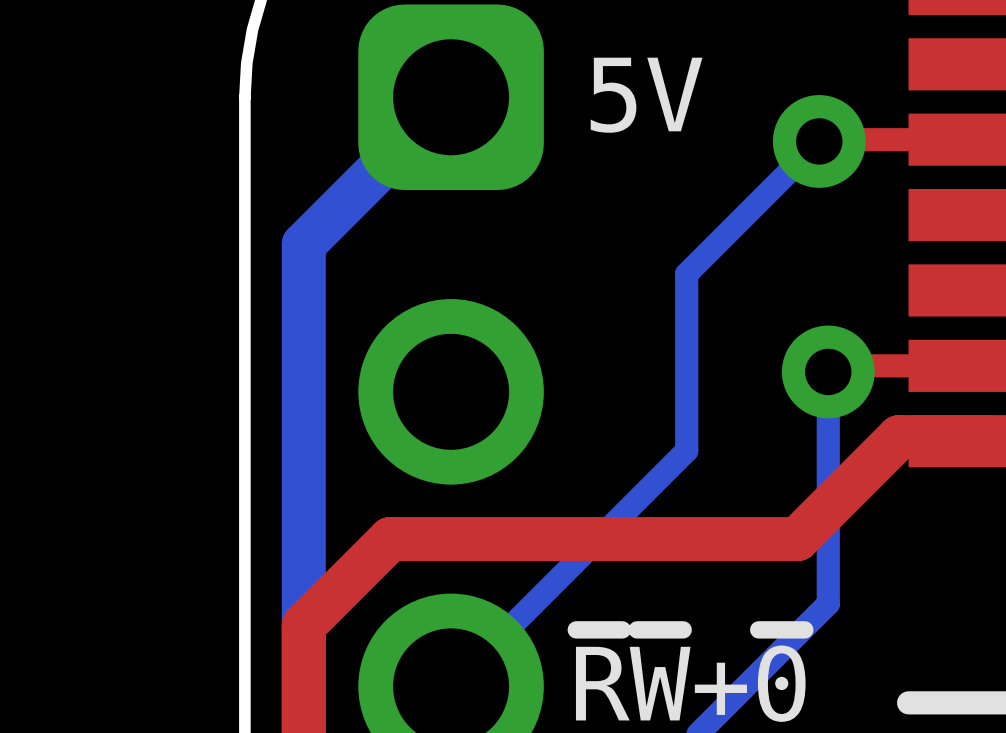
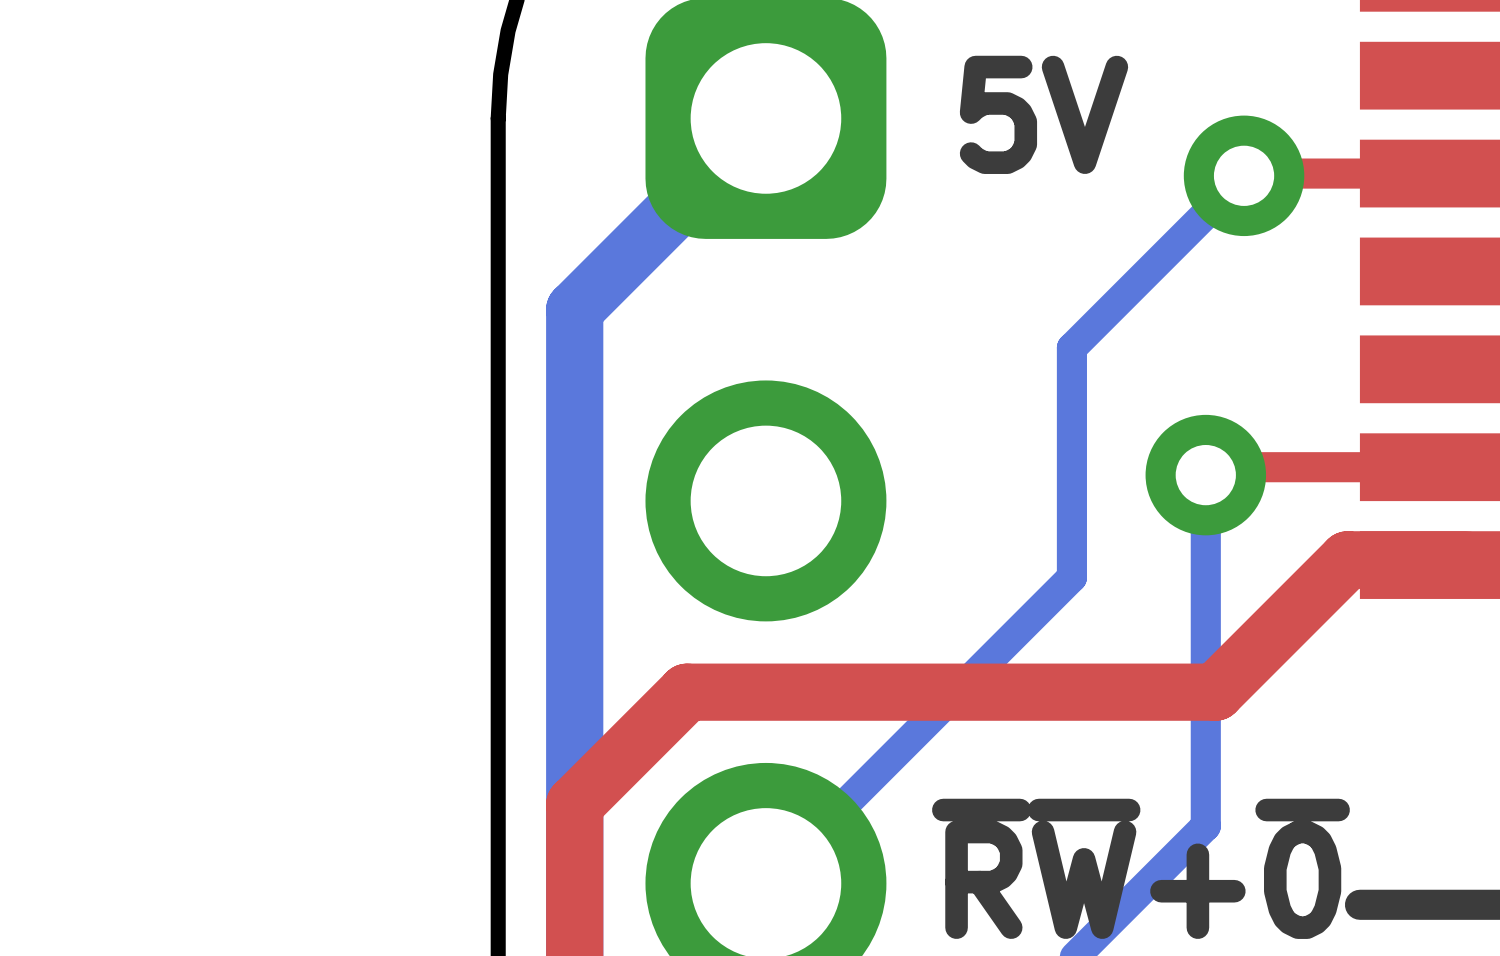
bottom track: (828, 371) (828, 603) (789, 642) -> (1205, 475) (1205, 826)
via position: (828, 371) -> (1205, 475)

